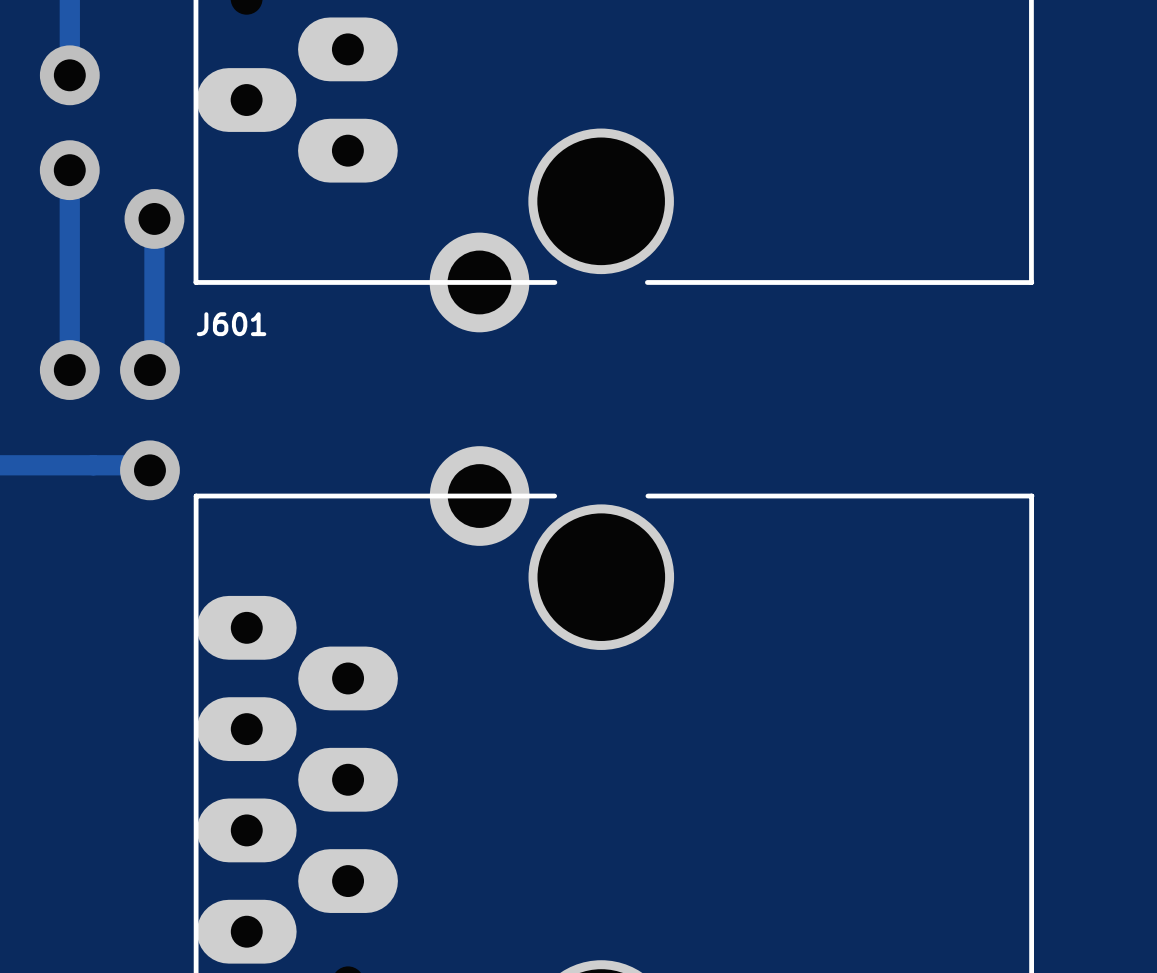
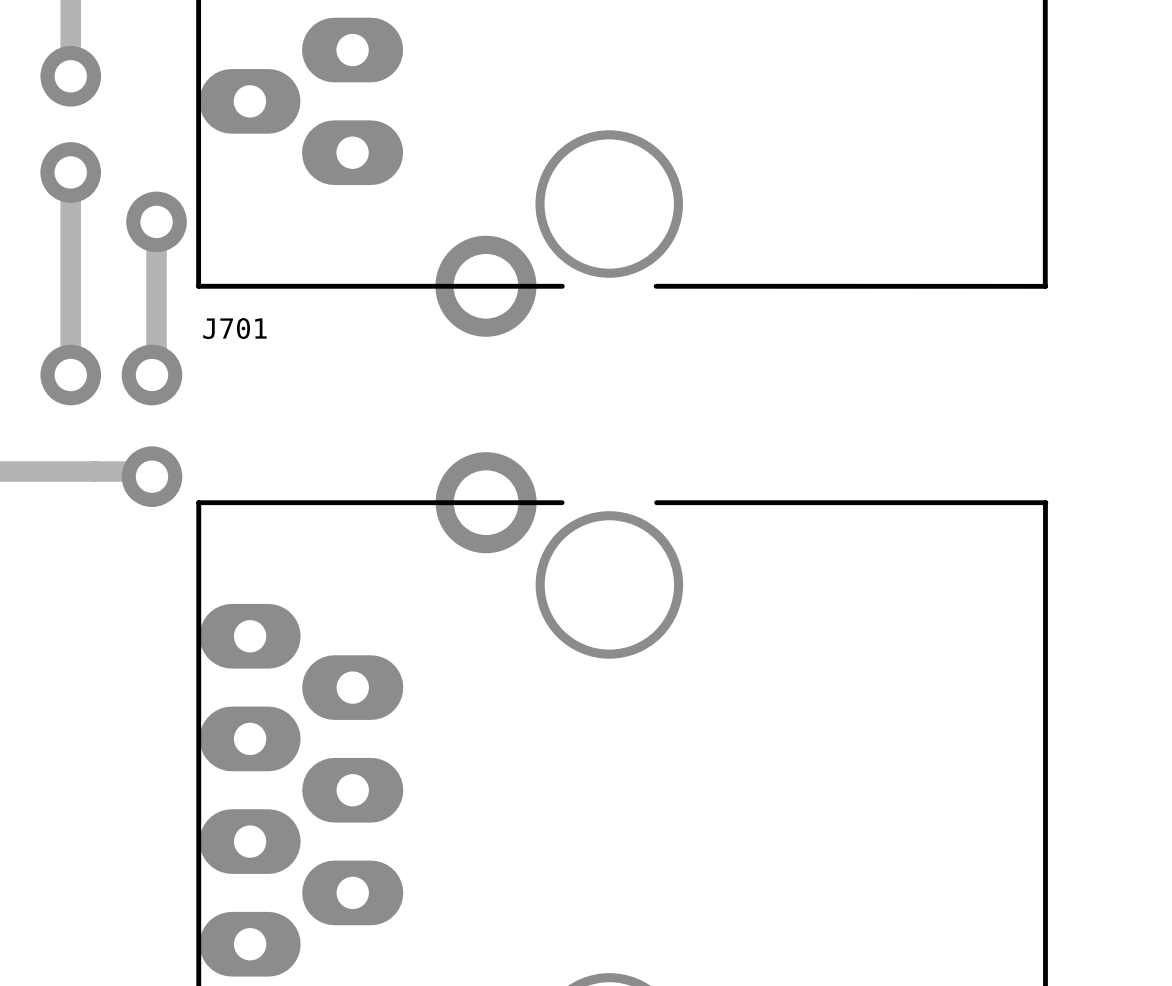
J601 name: J601 (231, 324) -> J701 (234, 328)

